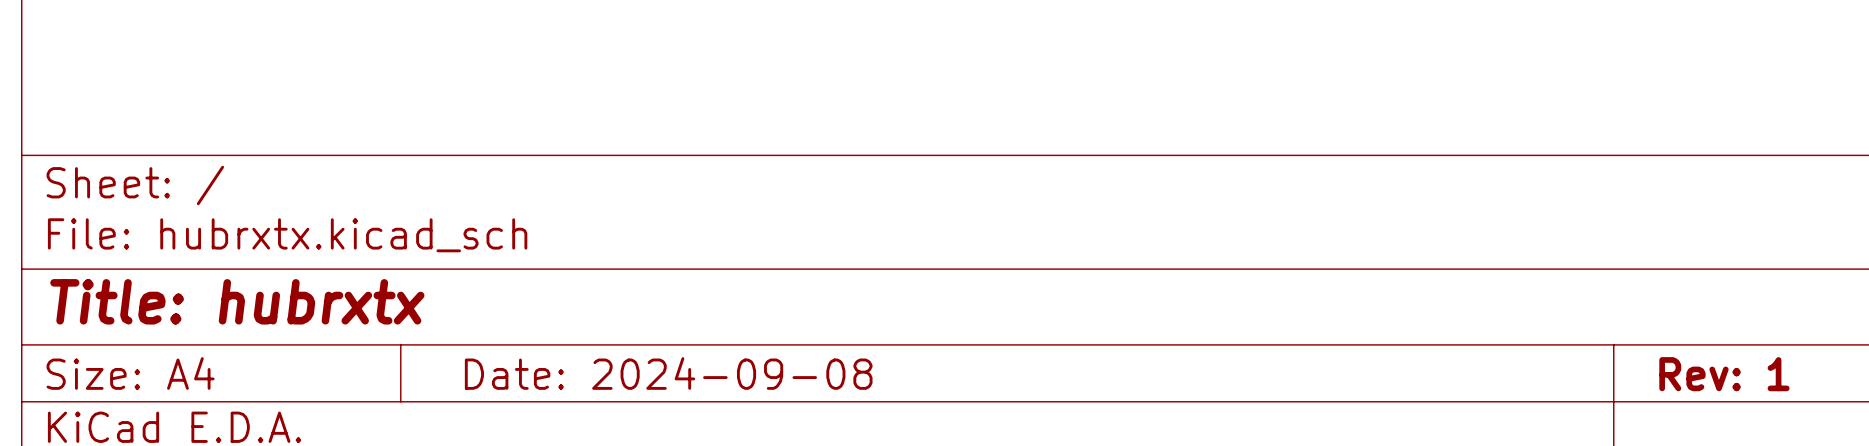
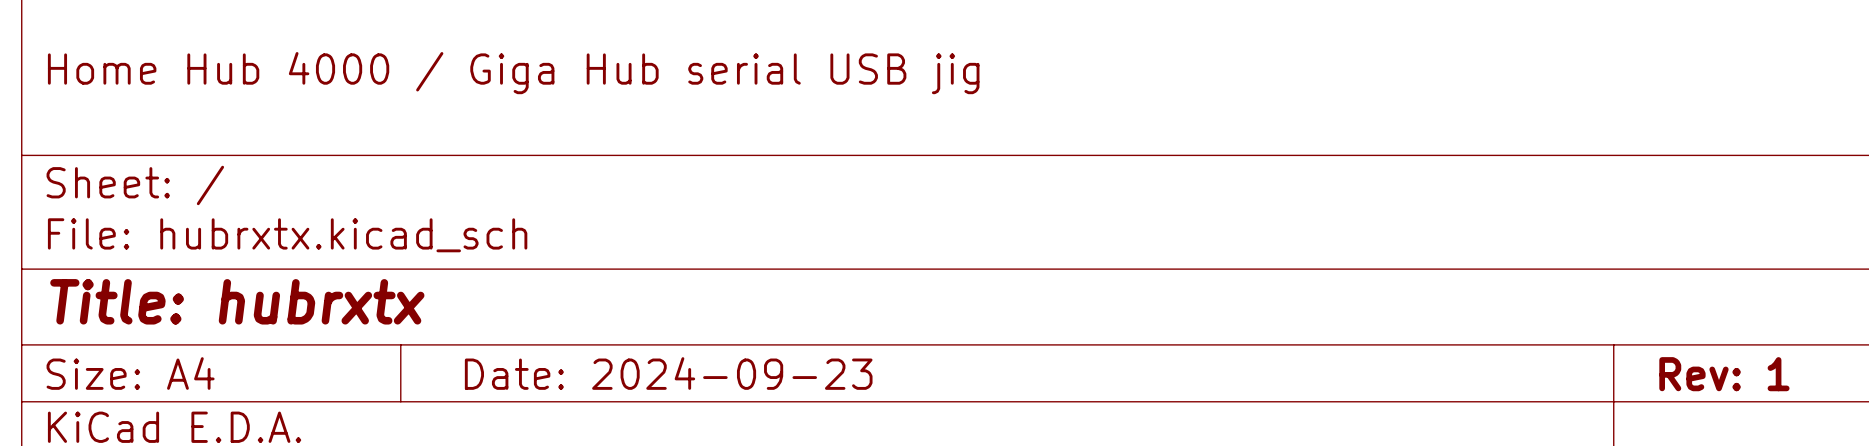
title block: none -> Home Hub 4000 / Giga Hub serial USB jig (513, 73)
title block: Date: 2024-09-08 (668, 373) -> Date: 2024-09-23 (668, 373)

